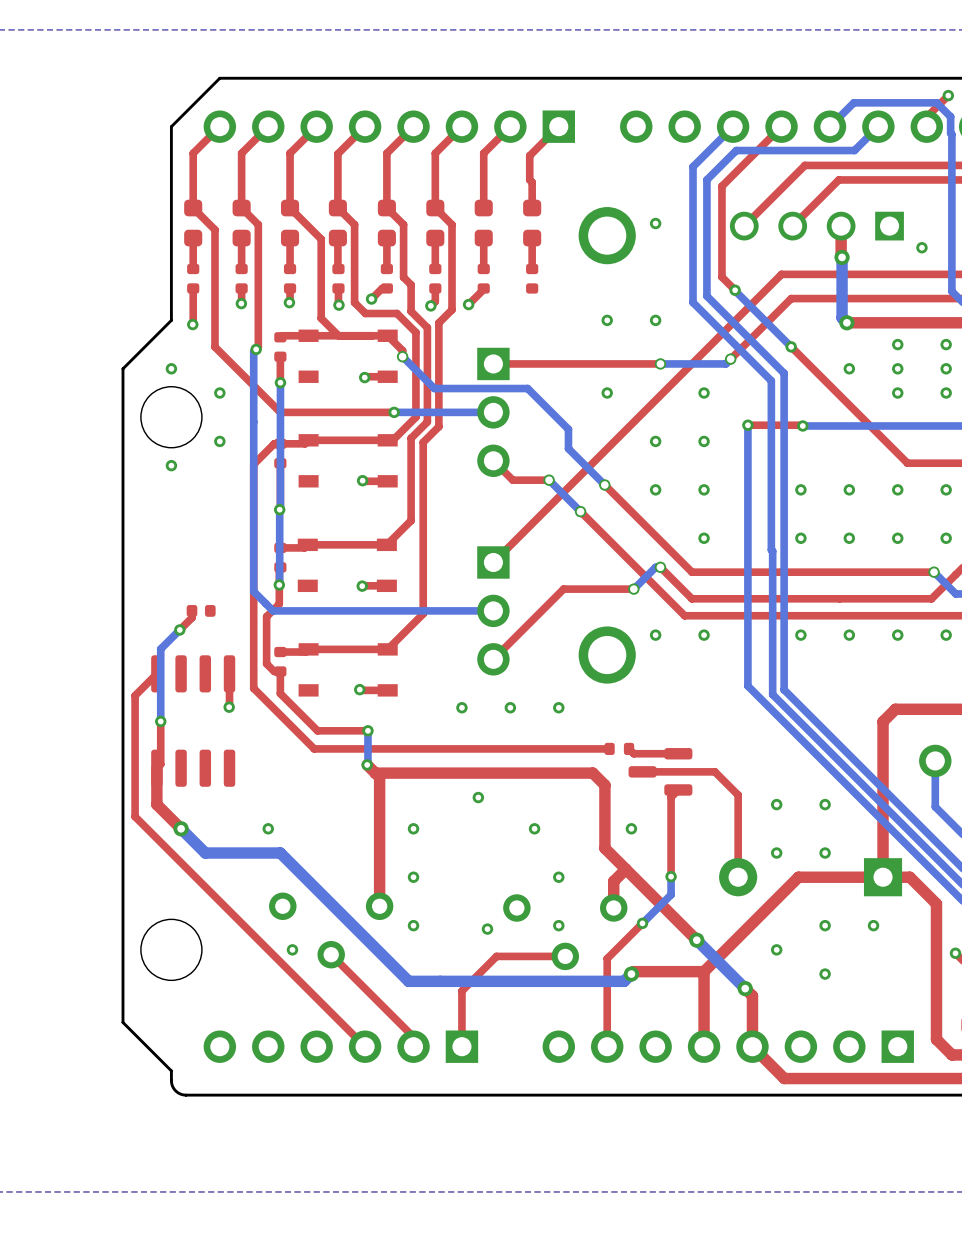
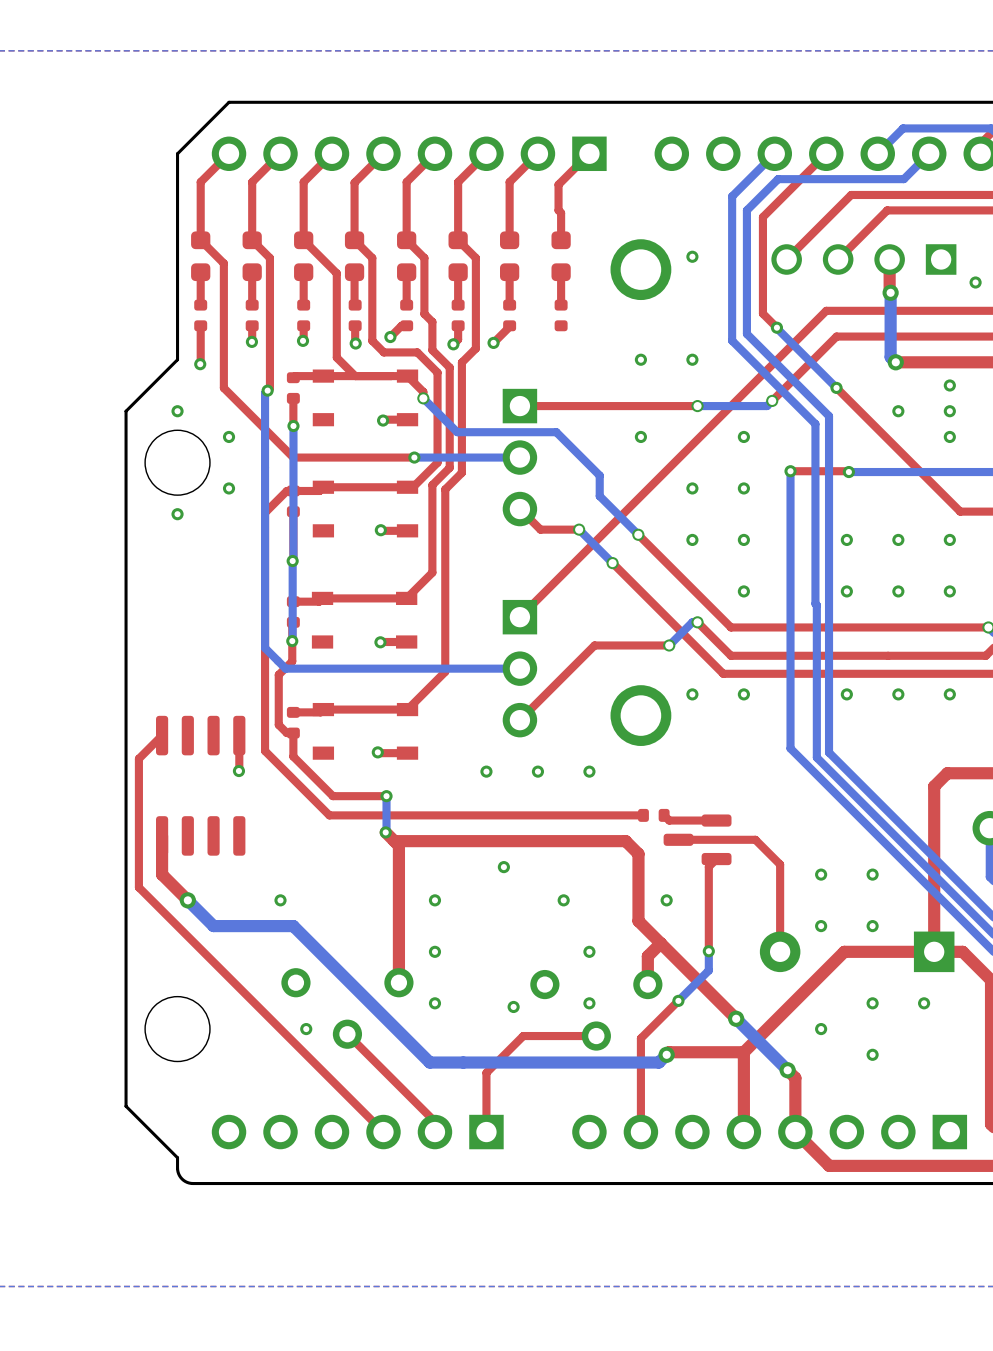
top track: (192, 610) (192, 617) (179, 629) -> none
part: (201, 610) -> none
bottom track: (179, 629) (160, 649) (160, 721) -> none
via: (179, 629) -> none
top track: (160, 721) (160, 764) (156, 768) -> none
via: (160, 721) -> none

